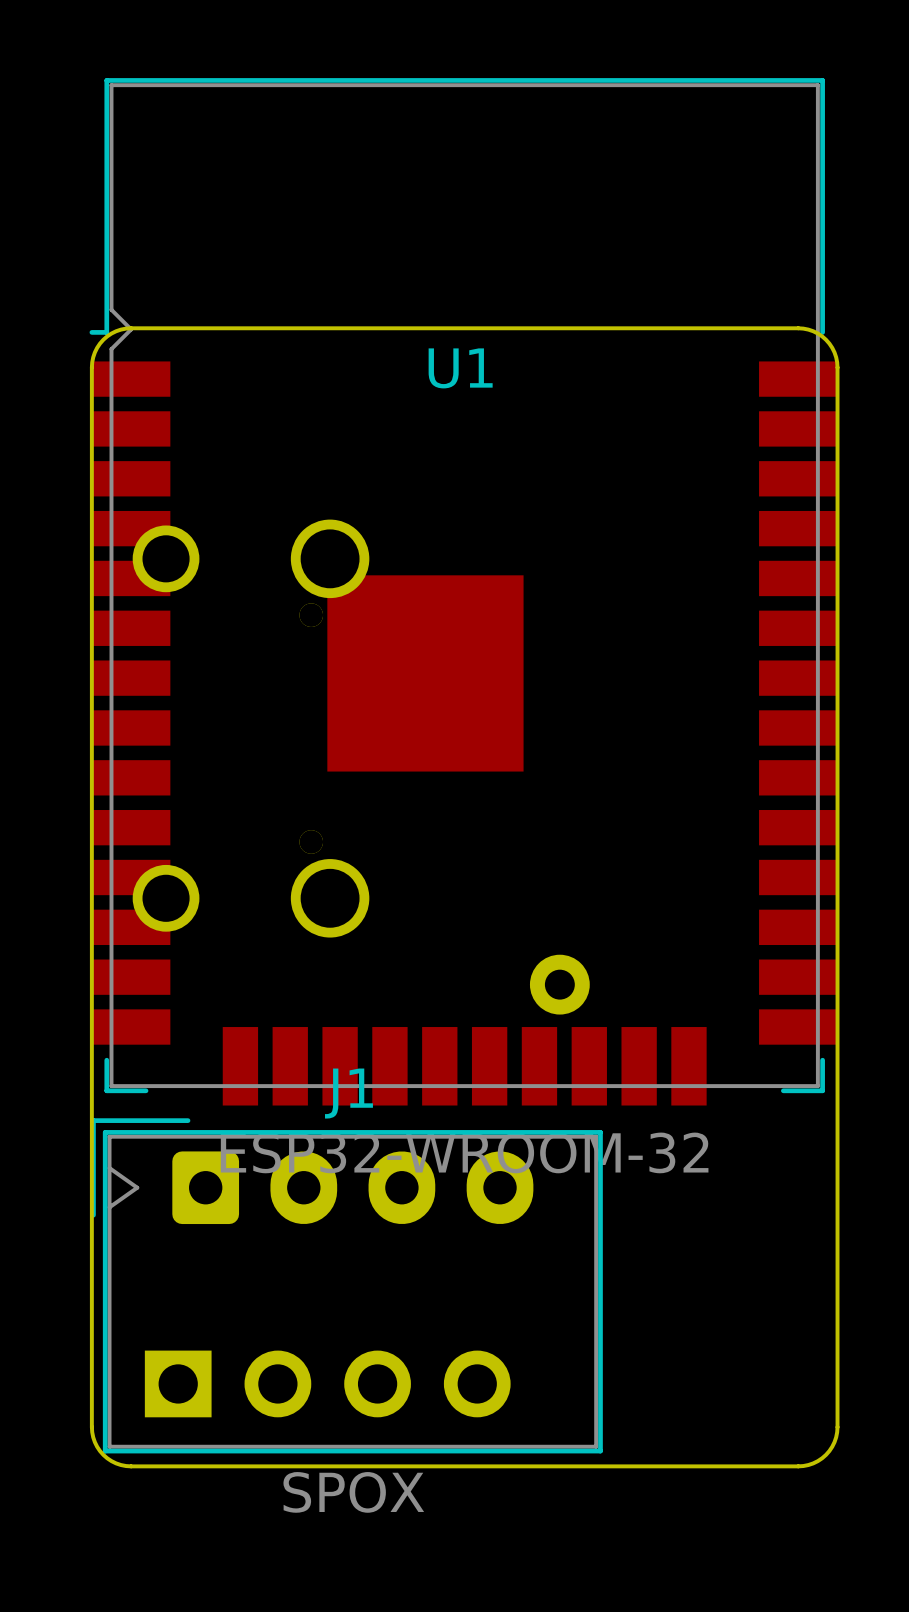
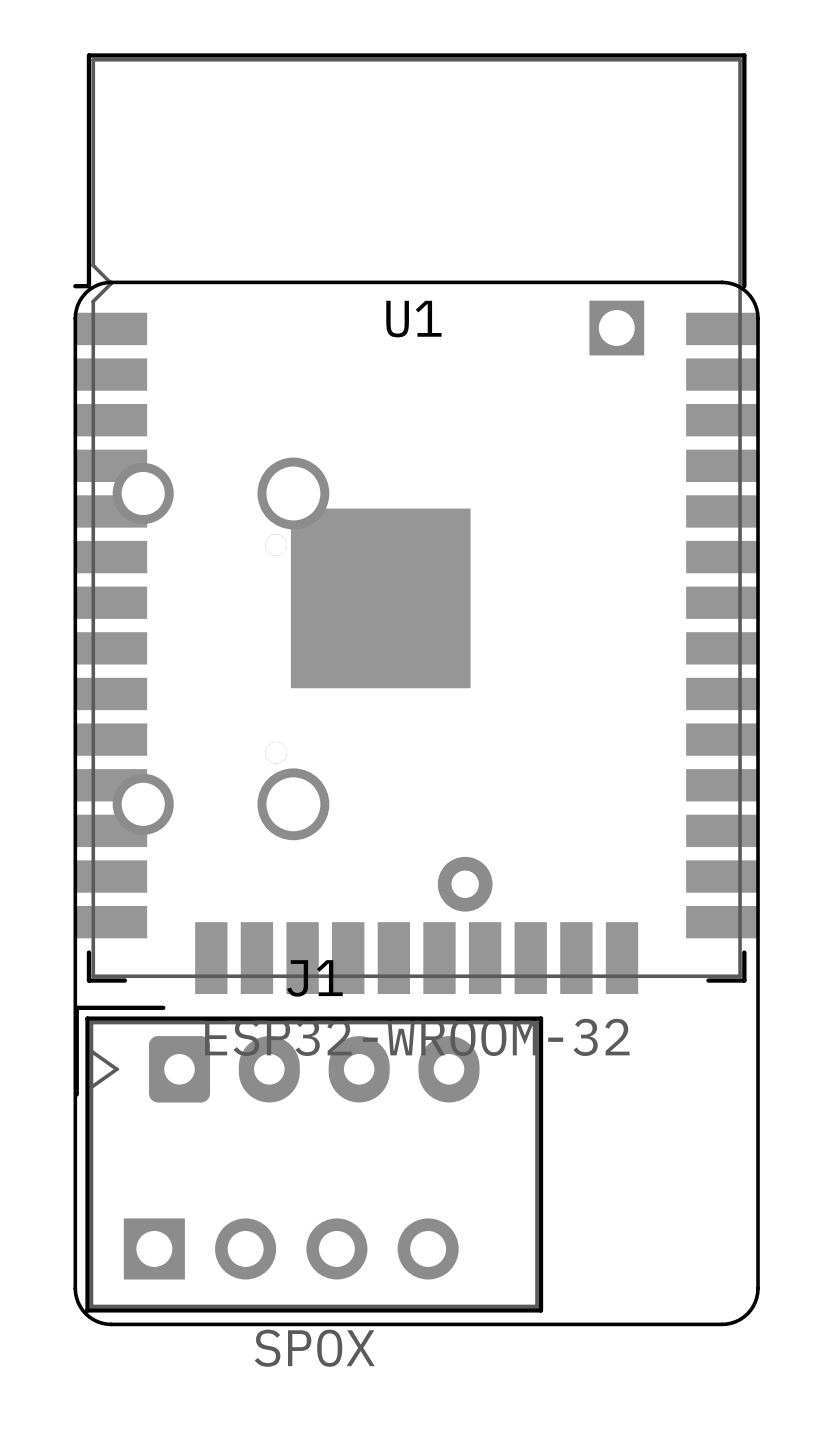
part: none -> (616, 328)
part position: (559, 984) -> (465, 884)

